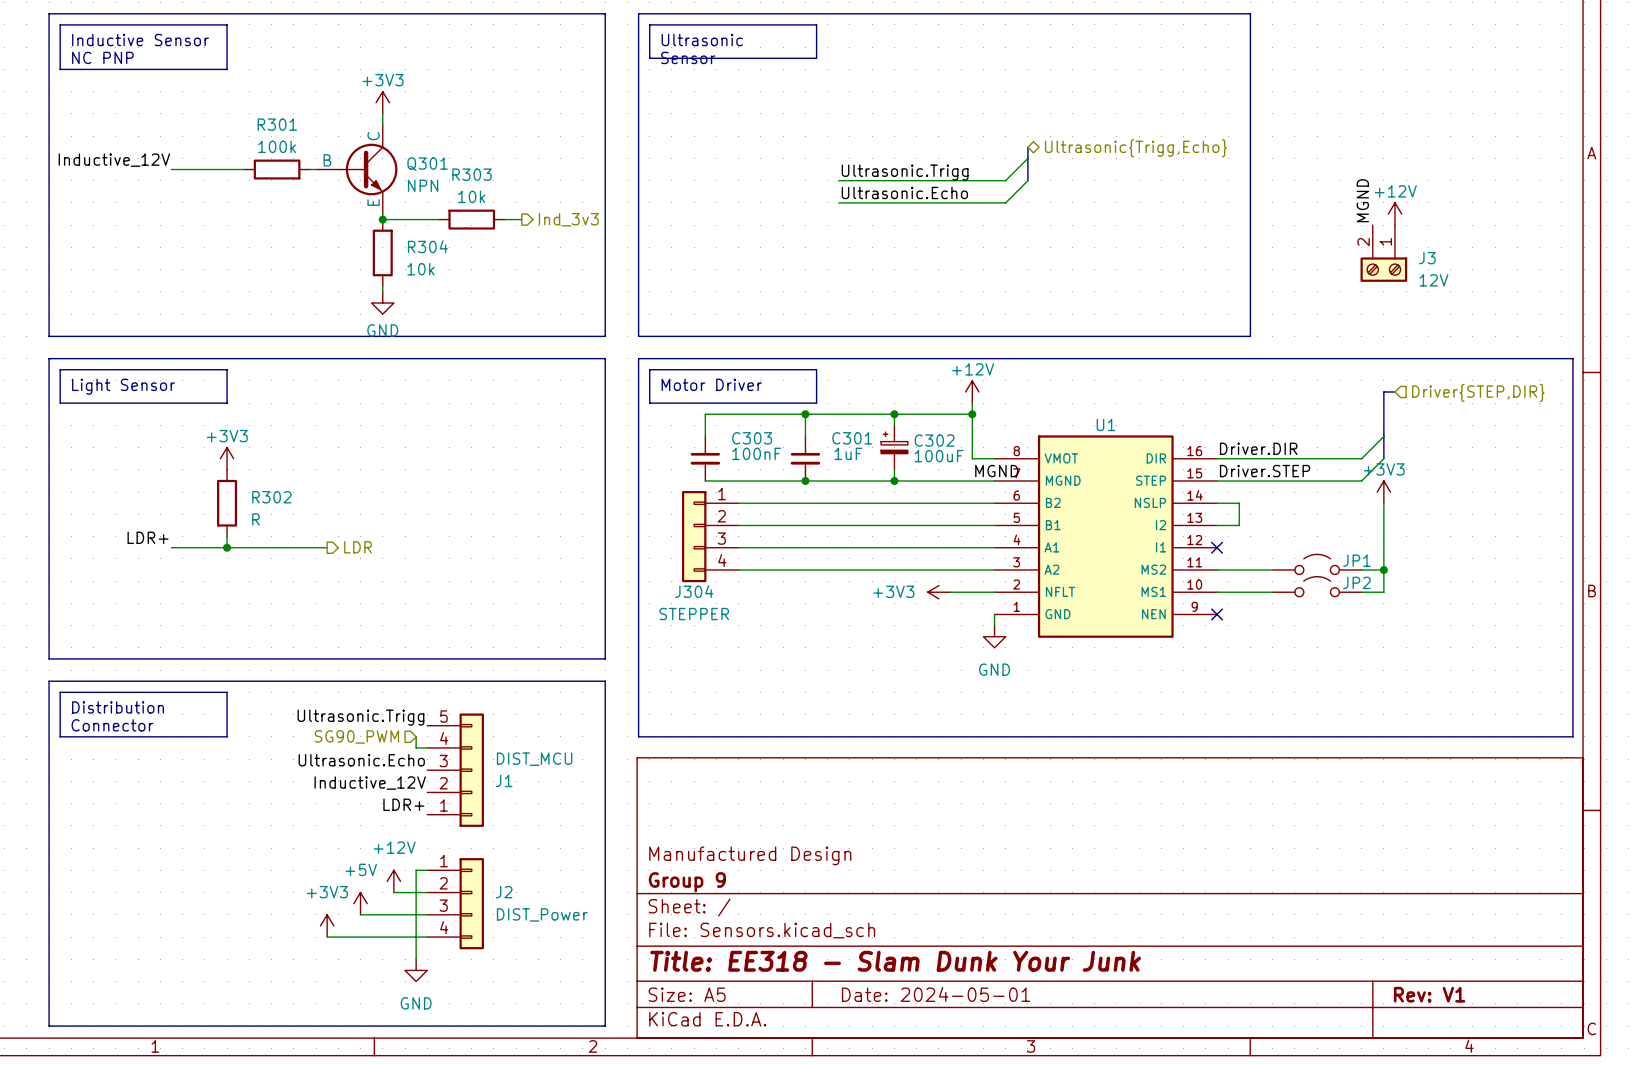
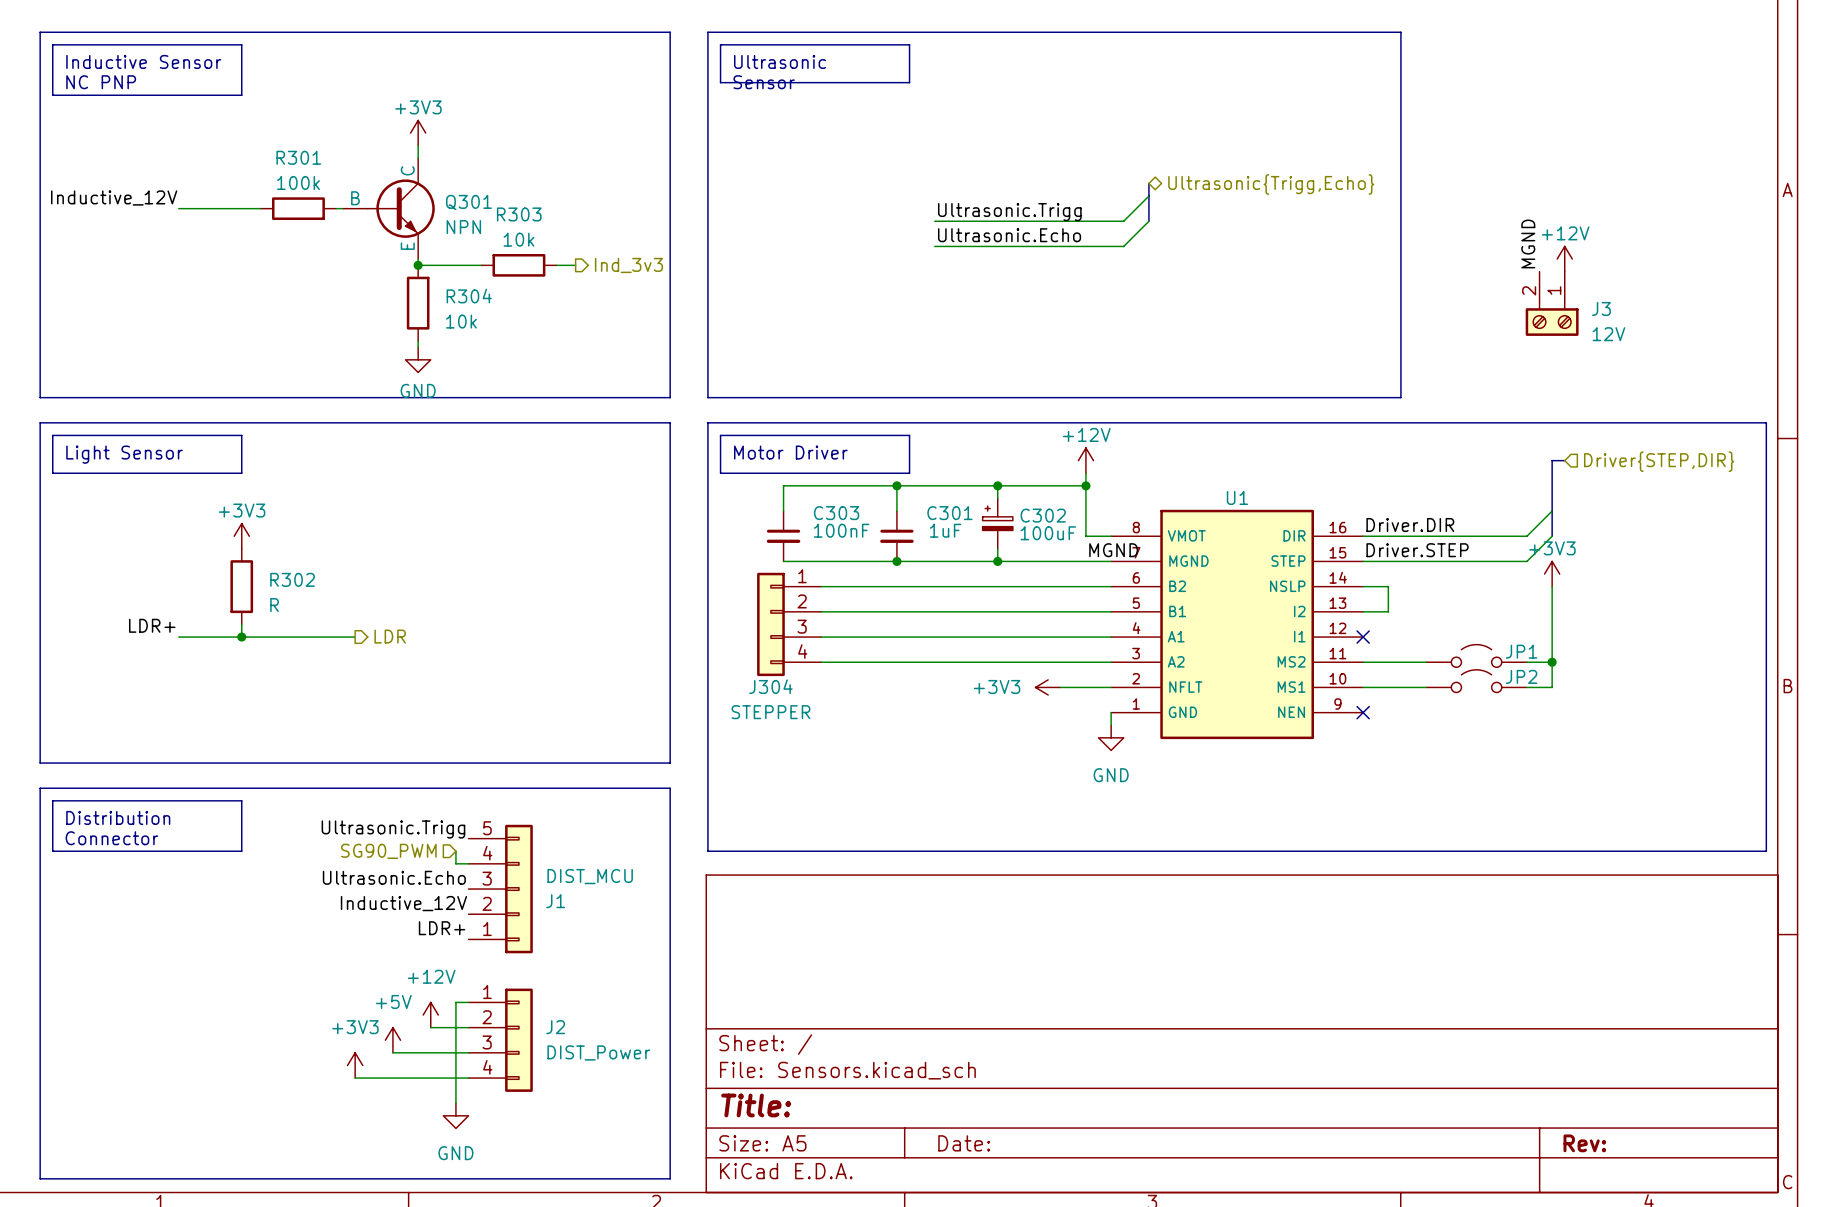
title block: Manufactured Design (750, 855) -> none
title block: Group 9 (687, 882) -> none
title block: Title: EE318 - Slam Dunk Your Junk (895, 961) -> Title: (756, 1105)
title block: Date: 2024-05-01 (936, 994) -> Date: (964, 1143)
title block: Rev: V1 (1429, 994) -> Rev: (1584, 1143)

